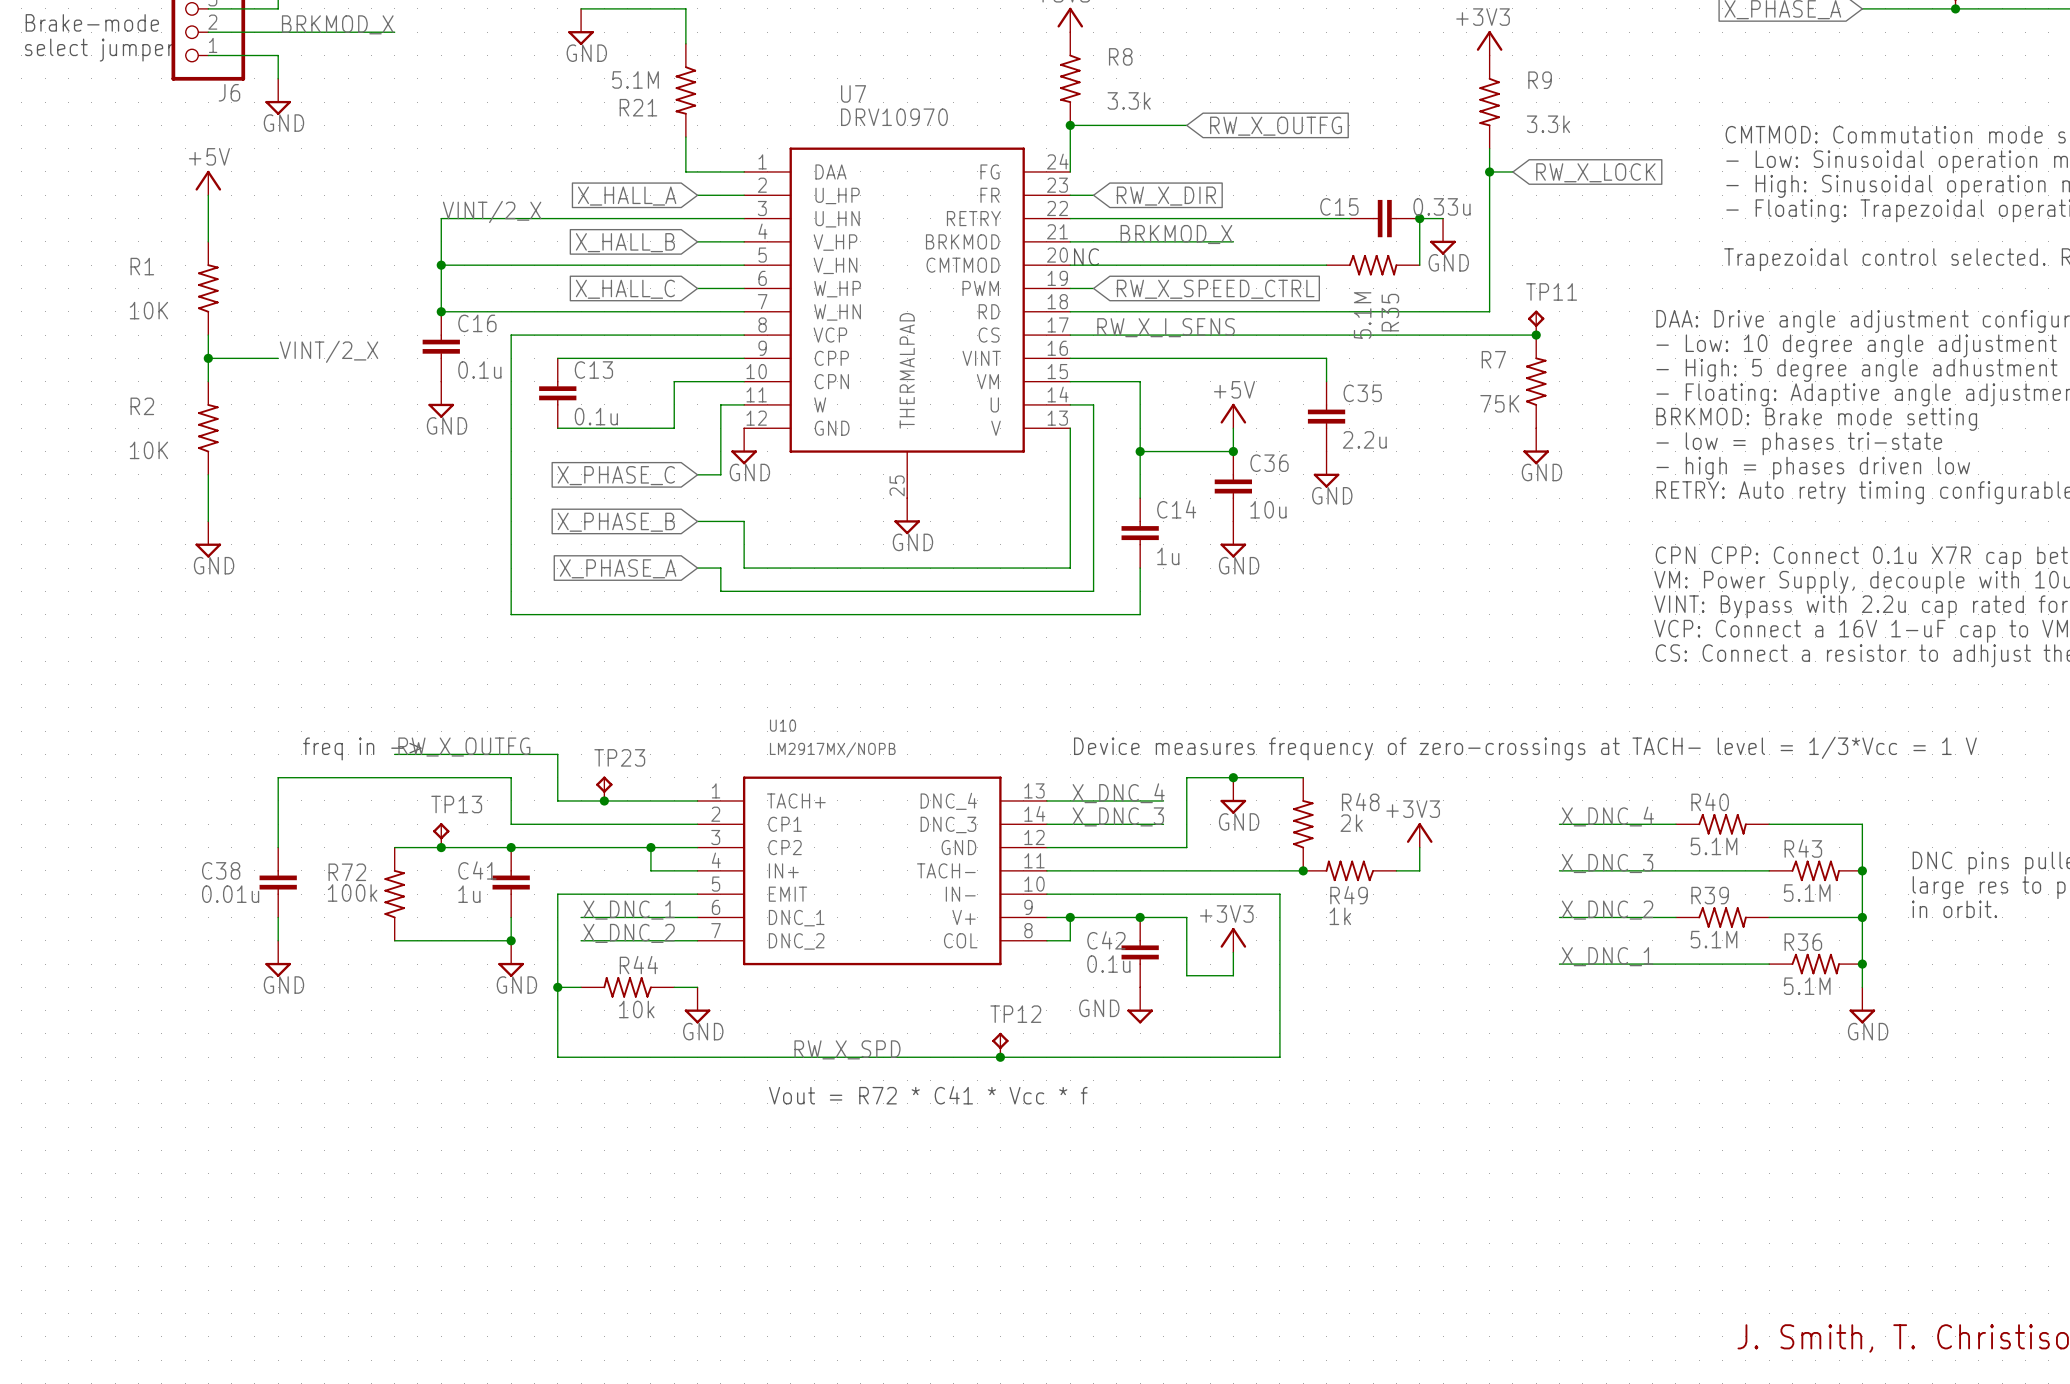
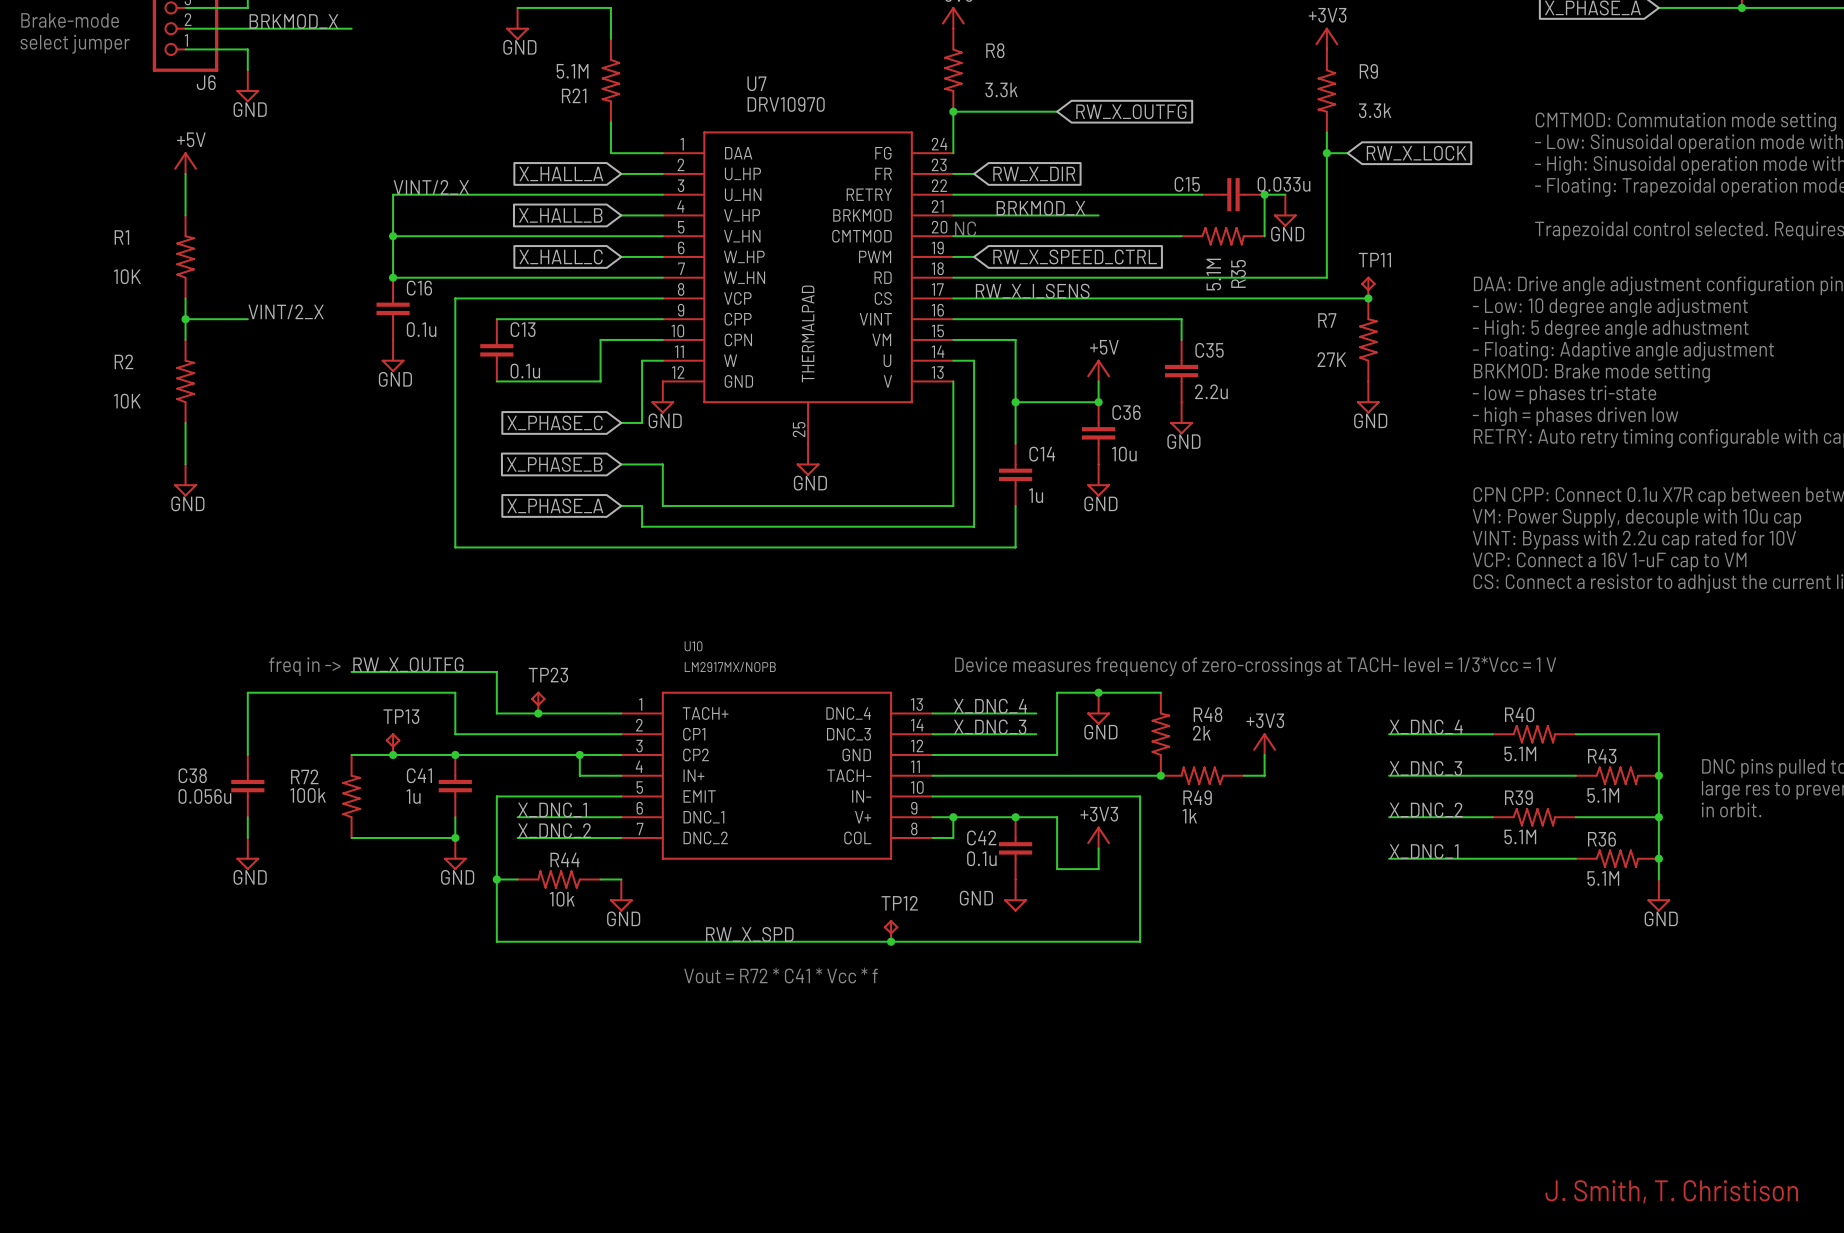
C15 value: 0.33u (1442, 206) -> 0.033u (1284, 184)
R7 value: 75K (1499, 403) -> 27K (1331, 359)
C38 value: 0.01u (230, 894) -> 0.056u (204, 796)

